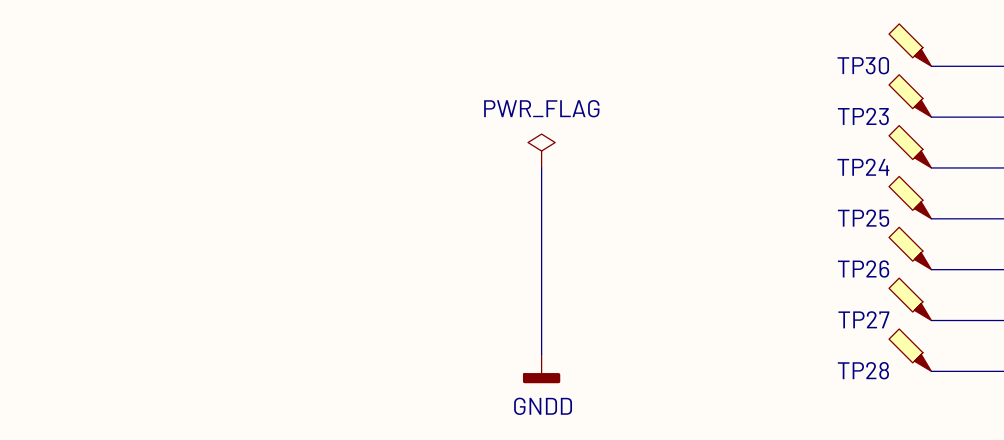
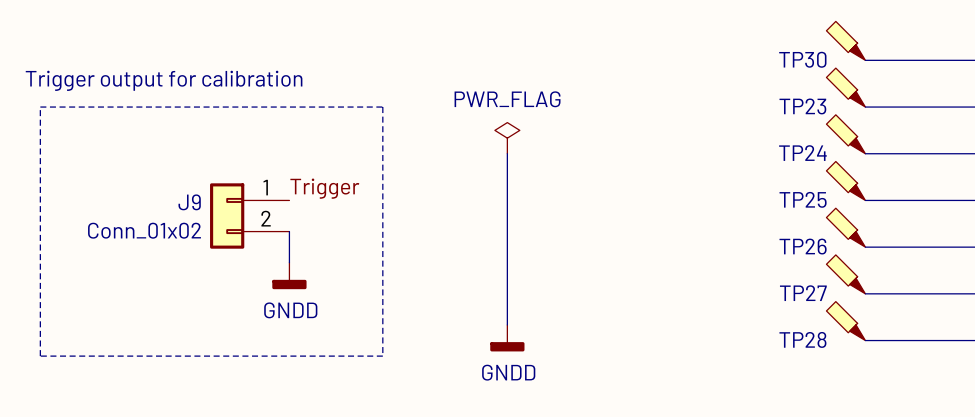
text: none -> Trigger output for calibration (164, 80)
line: none -> (40, 107) (40, 356) (382, 356) (382, 107) (40, 107)
label: none -> Trigger (324, 188)
J9: none -> Conn_01x02 (249, 216)
wire: none -> (289, 231) (289, 262)
power symbol: none -> GNDD (289, 275)

